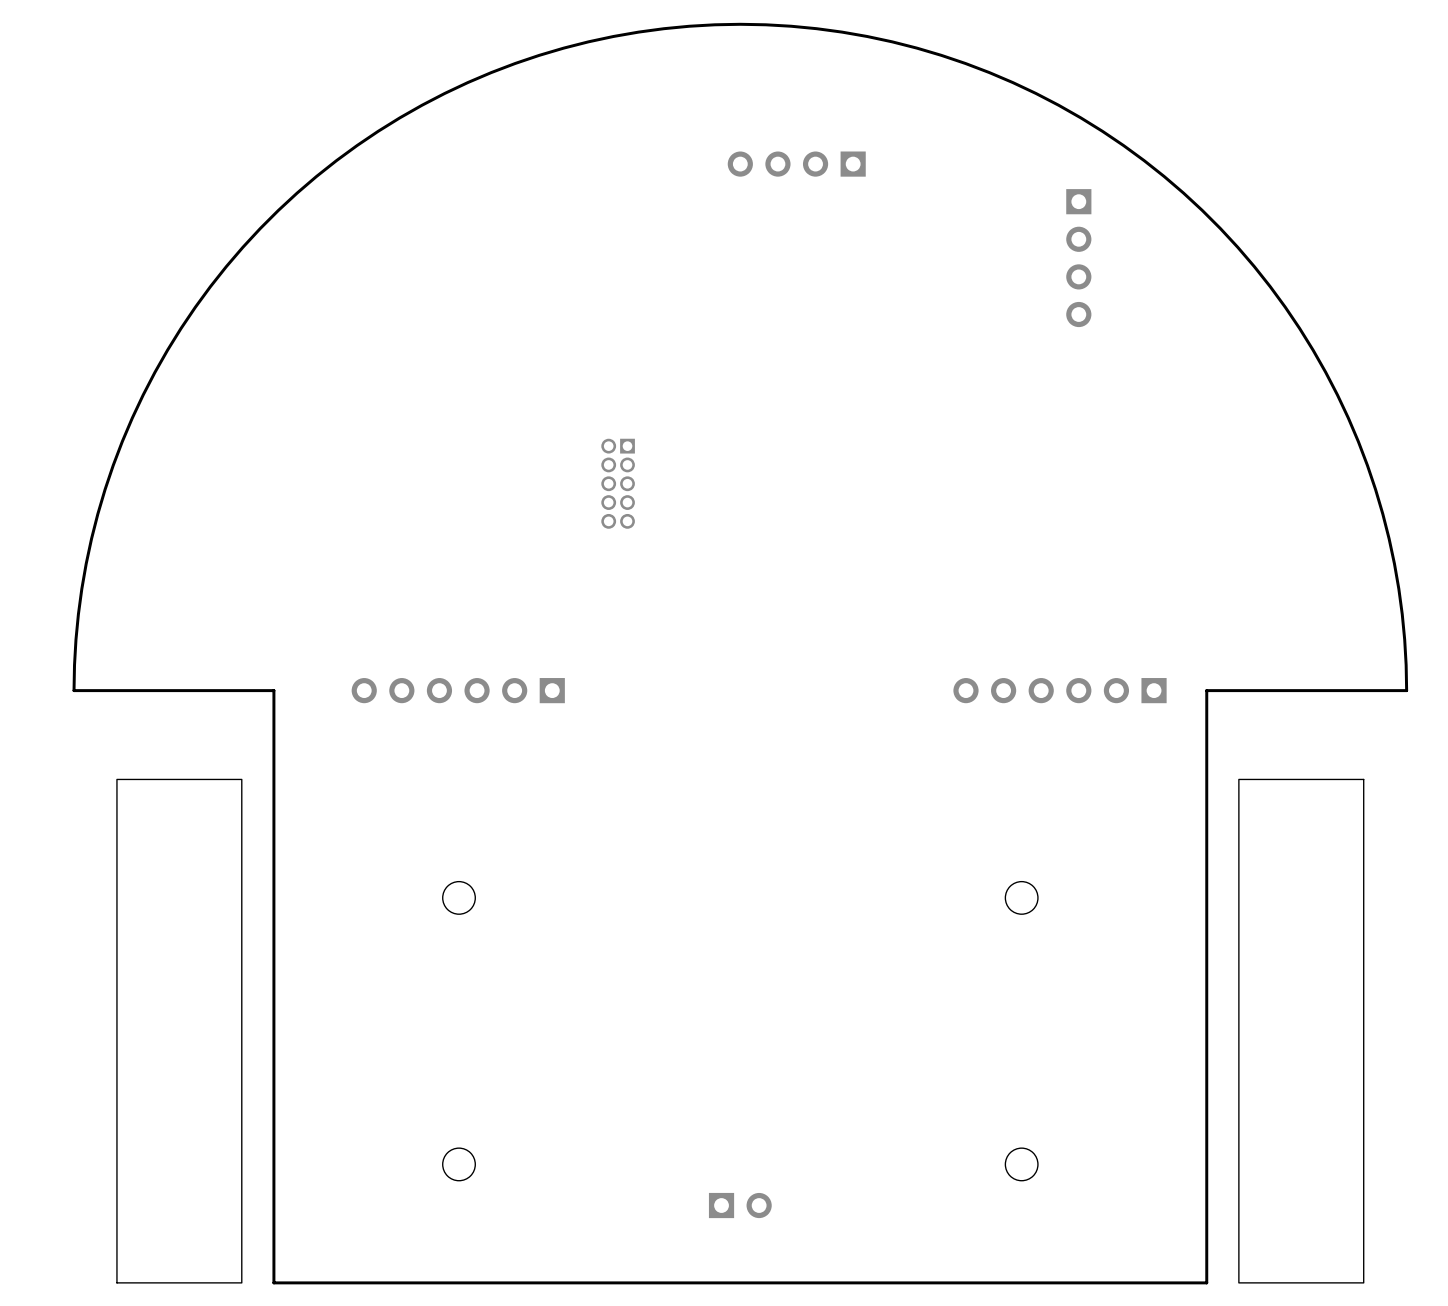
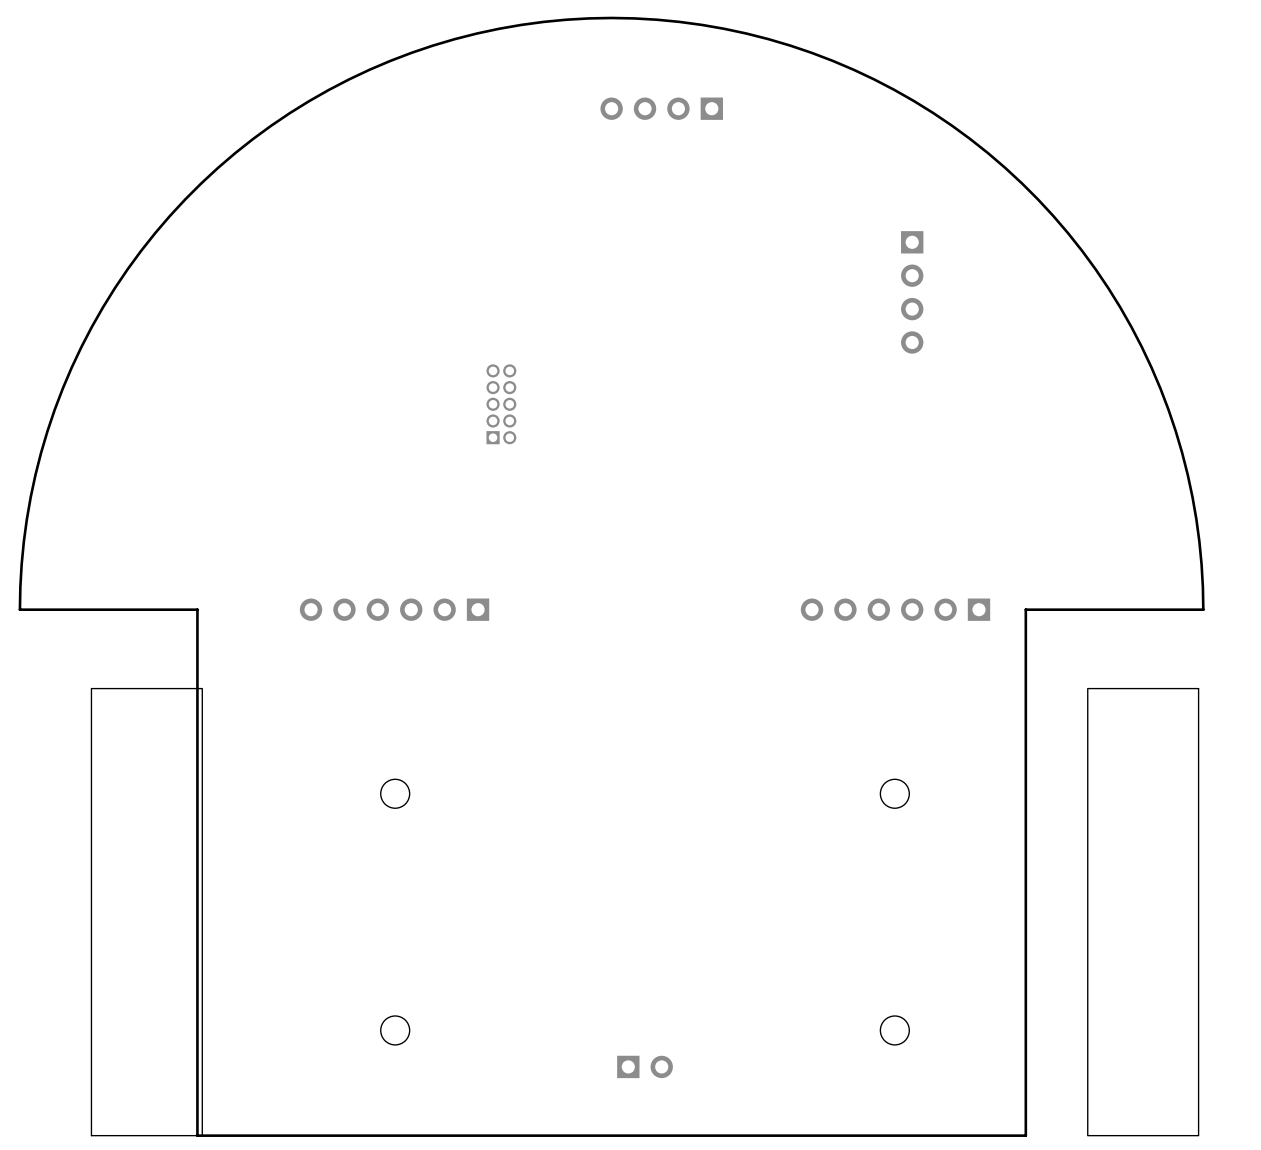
part position: (796, 164) -> (661, 108)
part position: (1078, 258) -> (912, 292)
part rotation: 0° (618, 483) -> 180° (501, 404)
board edge: (236, 690) (273, 690) (273, 1282) -> (197, 609) (197, 1135) (230, 1135)
part position: (1060, 690) -> (895, 609)
board edge: (1206, 690) (1206, 1282) (1169, 1282) -> (1059, 609) (1025, 609) (1025, 1135)
board edge: (1369, 690) (1406, 690) (1404, 639) (1398, 588) (1389, 538) (1375, 489) (1348, 418) (1313, 350) (1270, 286) (1220, 228) (1164, 176) (1123, 145) (1080, 117) (1012, 82) (965, 63) (892, 41) (816, 28) (740, 24) (663, 28) (613, 36) (563, 48) (491, 72) (422, 105) (378, 131) (316, 176) (260, 228) (210, 286) (181, 328) (143, 394) (122, 441) (97, 514) (86, 563) (78, 614) (74, 690) -> (1203, 609) (1201, 564) (1192, 497) (1182, 452) (1160, 388) (1141, 347) (1108, 288) (1082, 250) (1037, 199) (988, 153) (933, 113) (894, 89) (832, 60) (768, 39) (724, 28) (656, 19) (611, 17) (566, 19) (498, 28) (433, 45) (390, 60) (328, 89) (271, 125) (217, 167) (185, 199) (141, 250) (103, 307) (71, 367) (47, 431) (35, 474) (26, 519) (21, 564) (19, 609) (53, 609)

